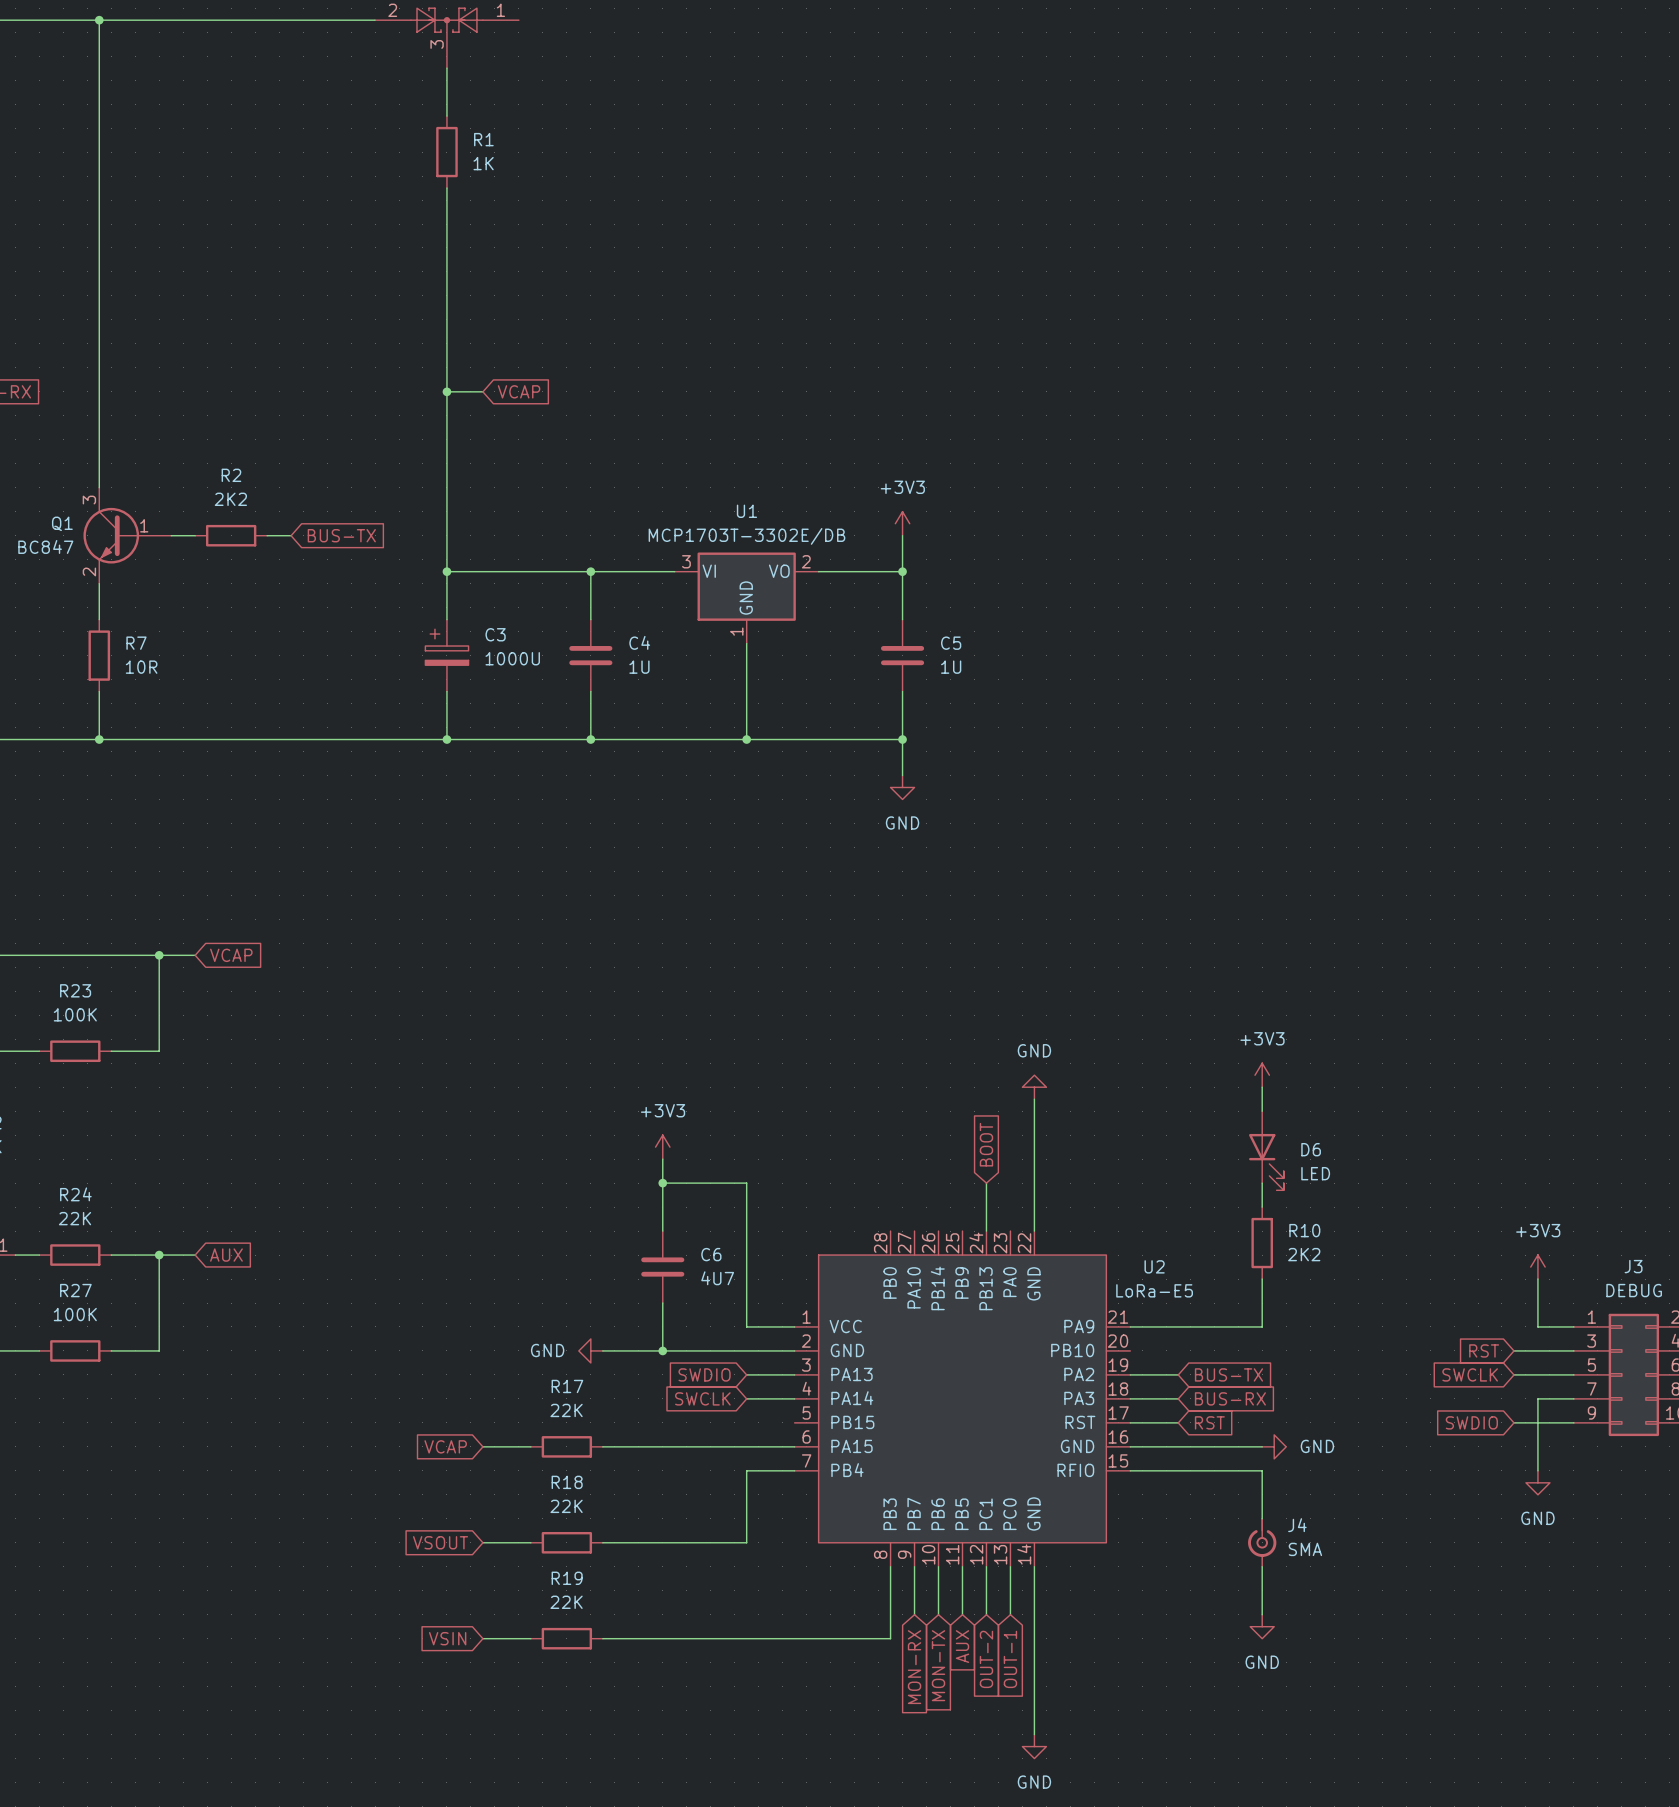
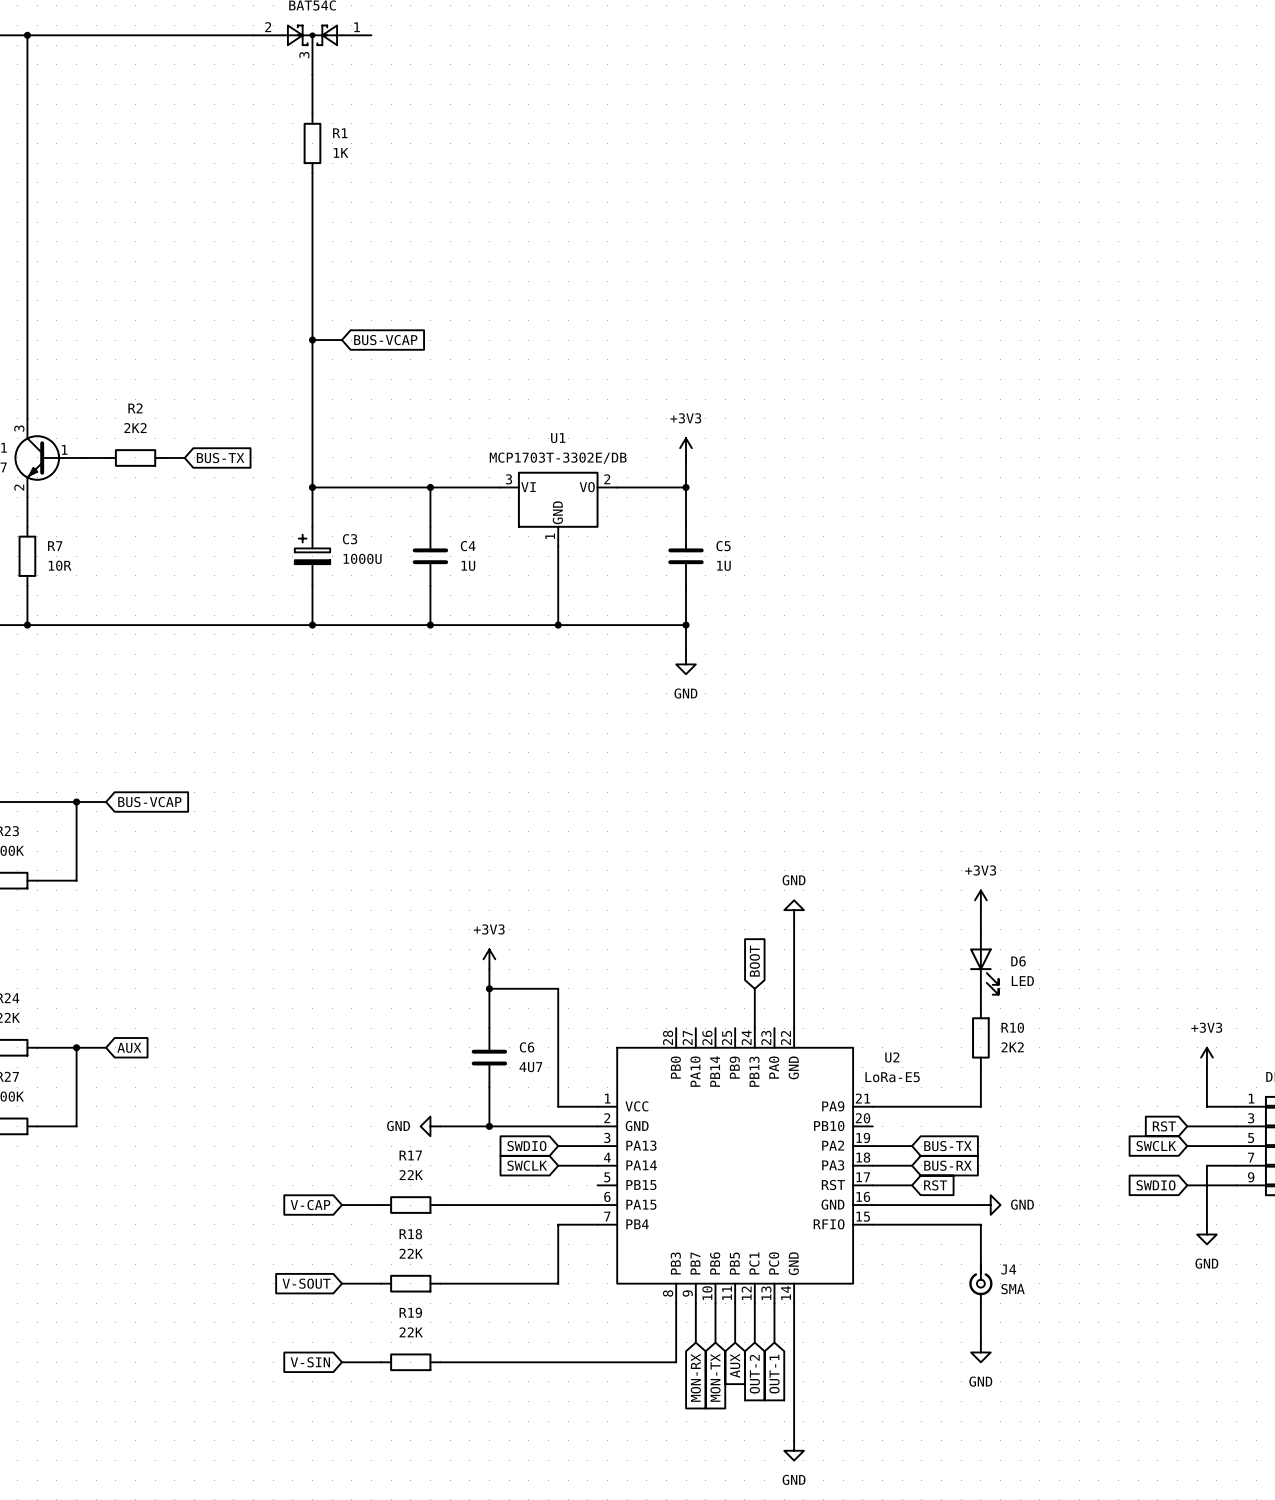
global label: VCAP (519, 391) -> BUS-VCAP (385, 340)
global label: VCAP (231, 955) -> BUS-VCAP (149, 802)
global label: VCAP (445, 1446) -> V-CAP (310, 1205)
global label: VSOUT (440, 1542) -> V-SOUT (306, 1283)
global label: VSIN (447, 1638) -> V-SIN (310, 1362)

